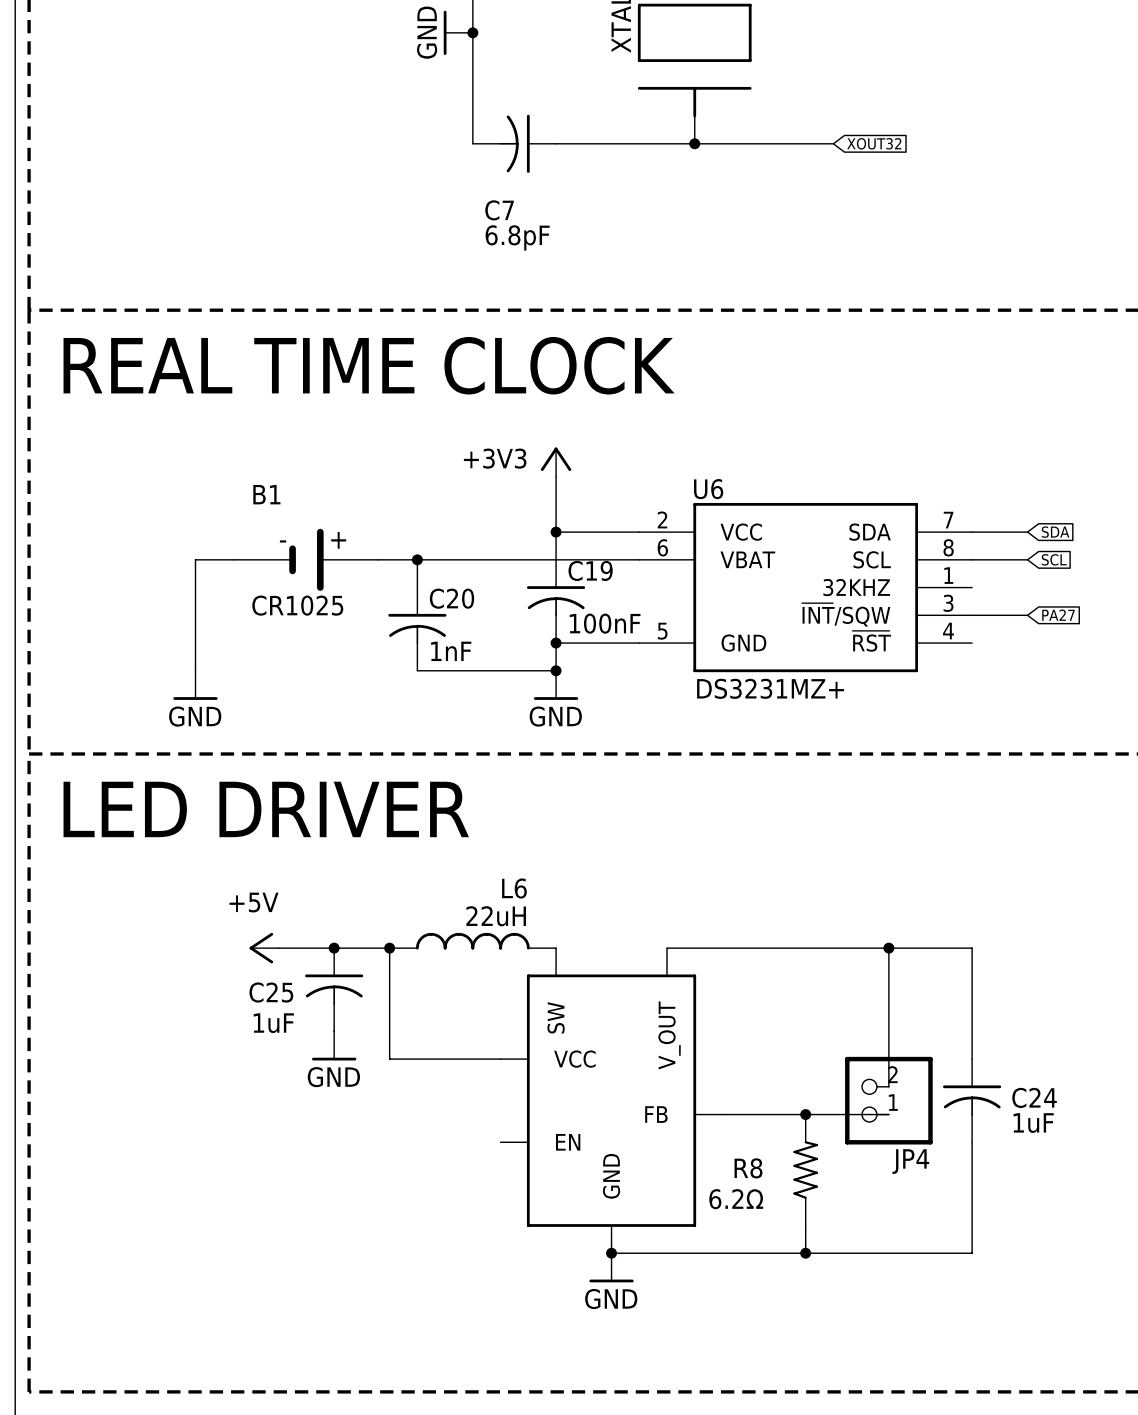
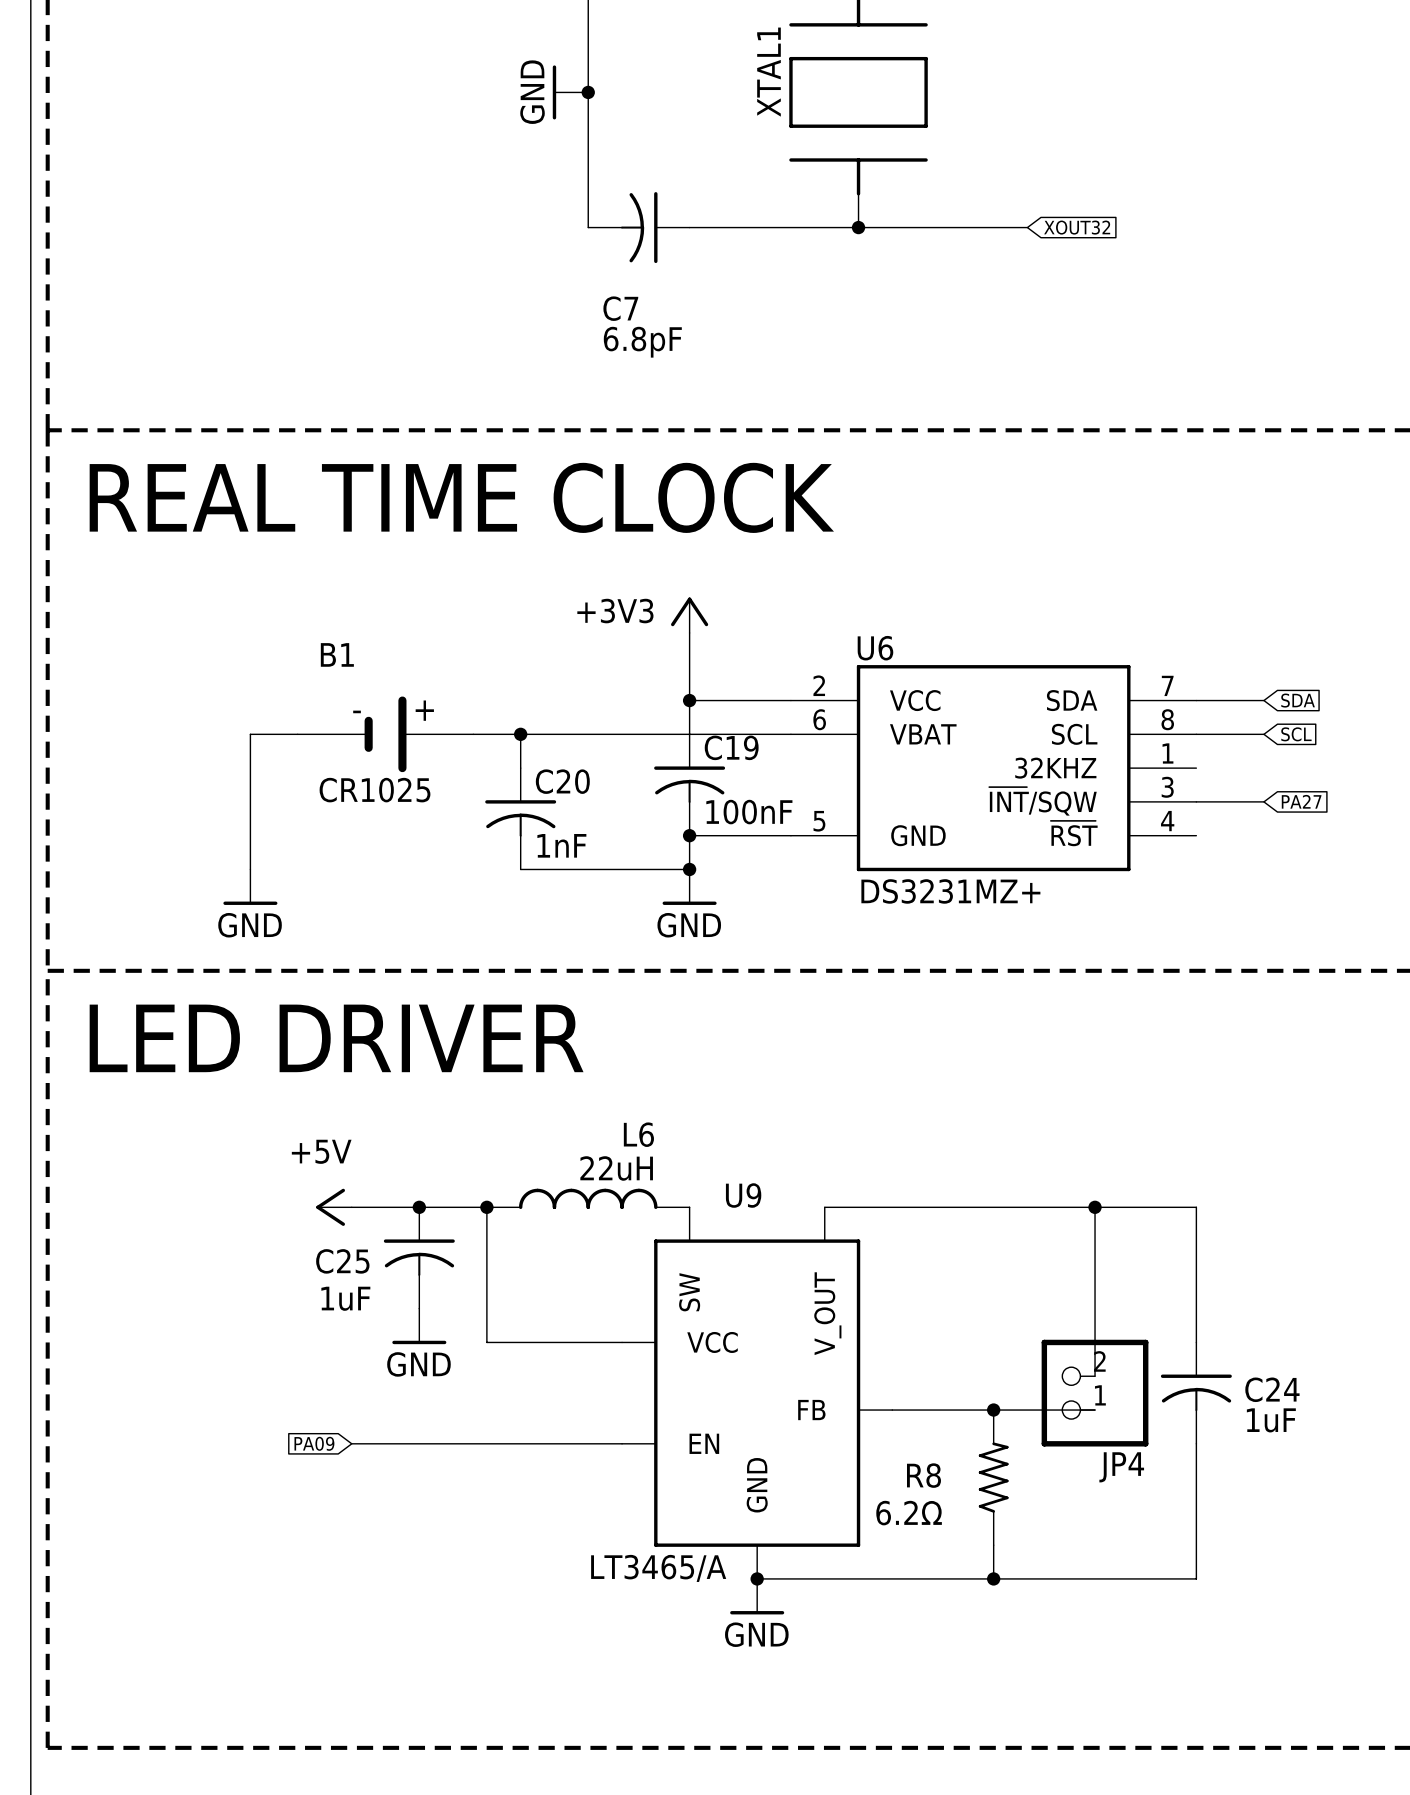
U9 name: none -> U9 (743, 1195)
global label: none -> PA09 (314, 1443)
wire: none -> (351, 1443) (622, 1443)
U9 value: none -> LT3465/A (658, 1568)

